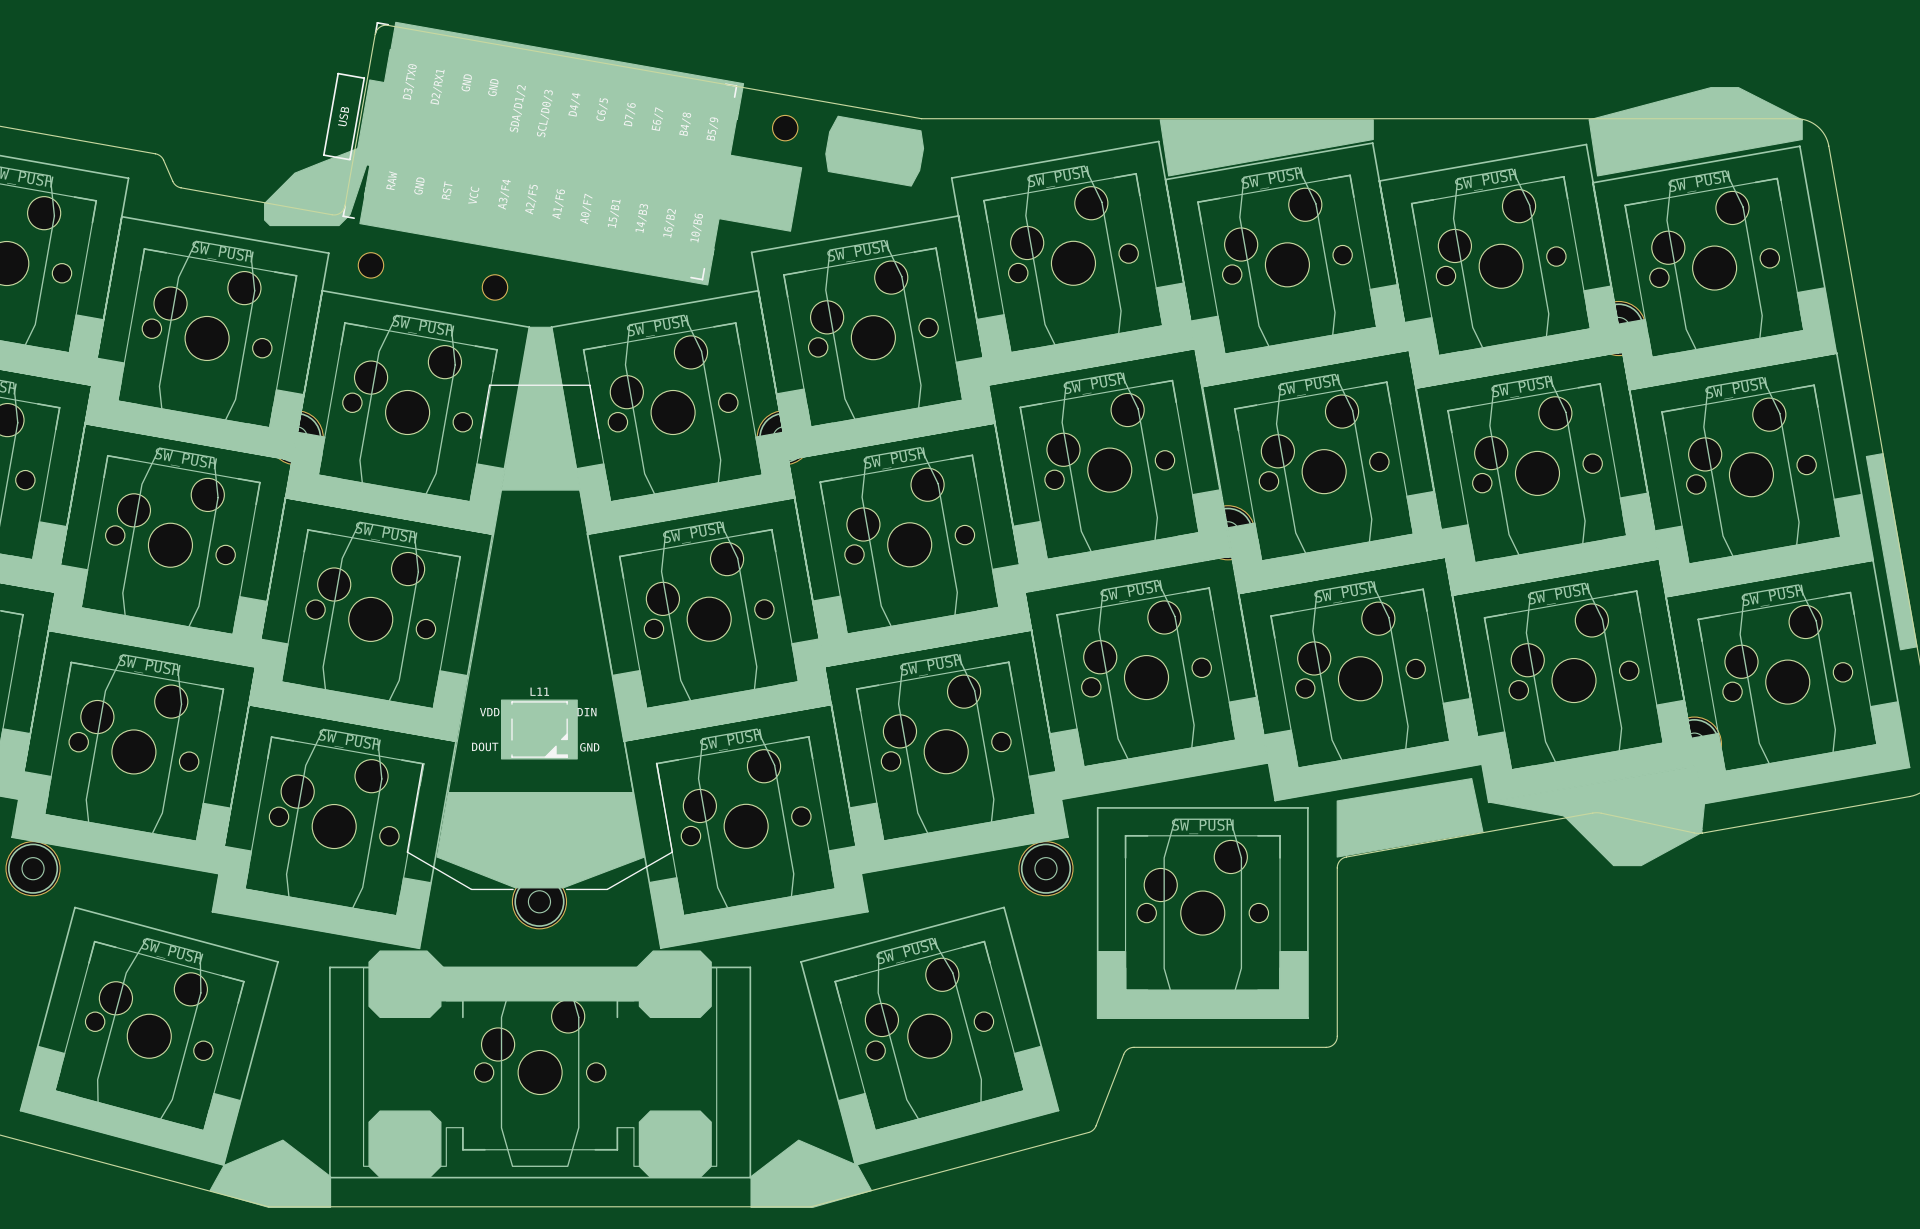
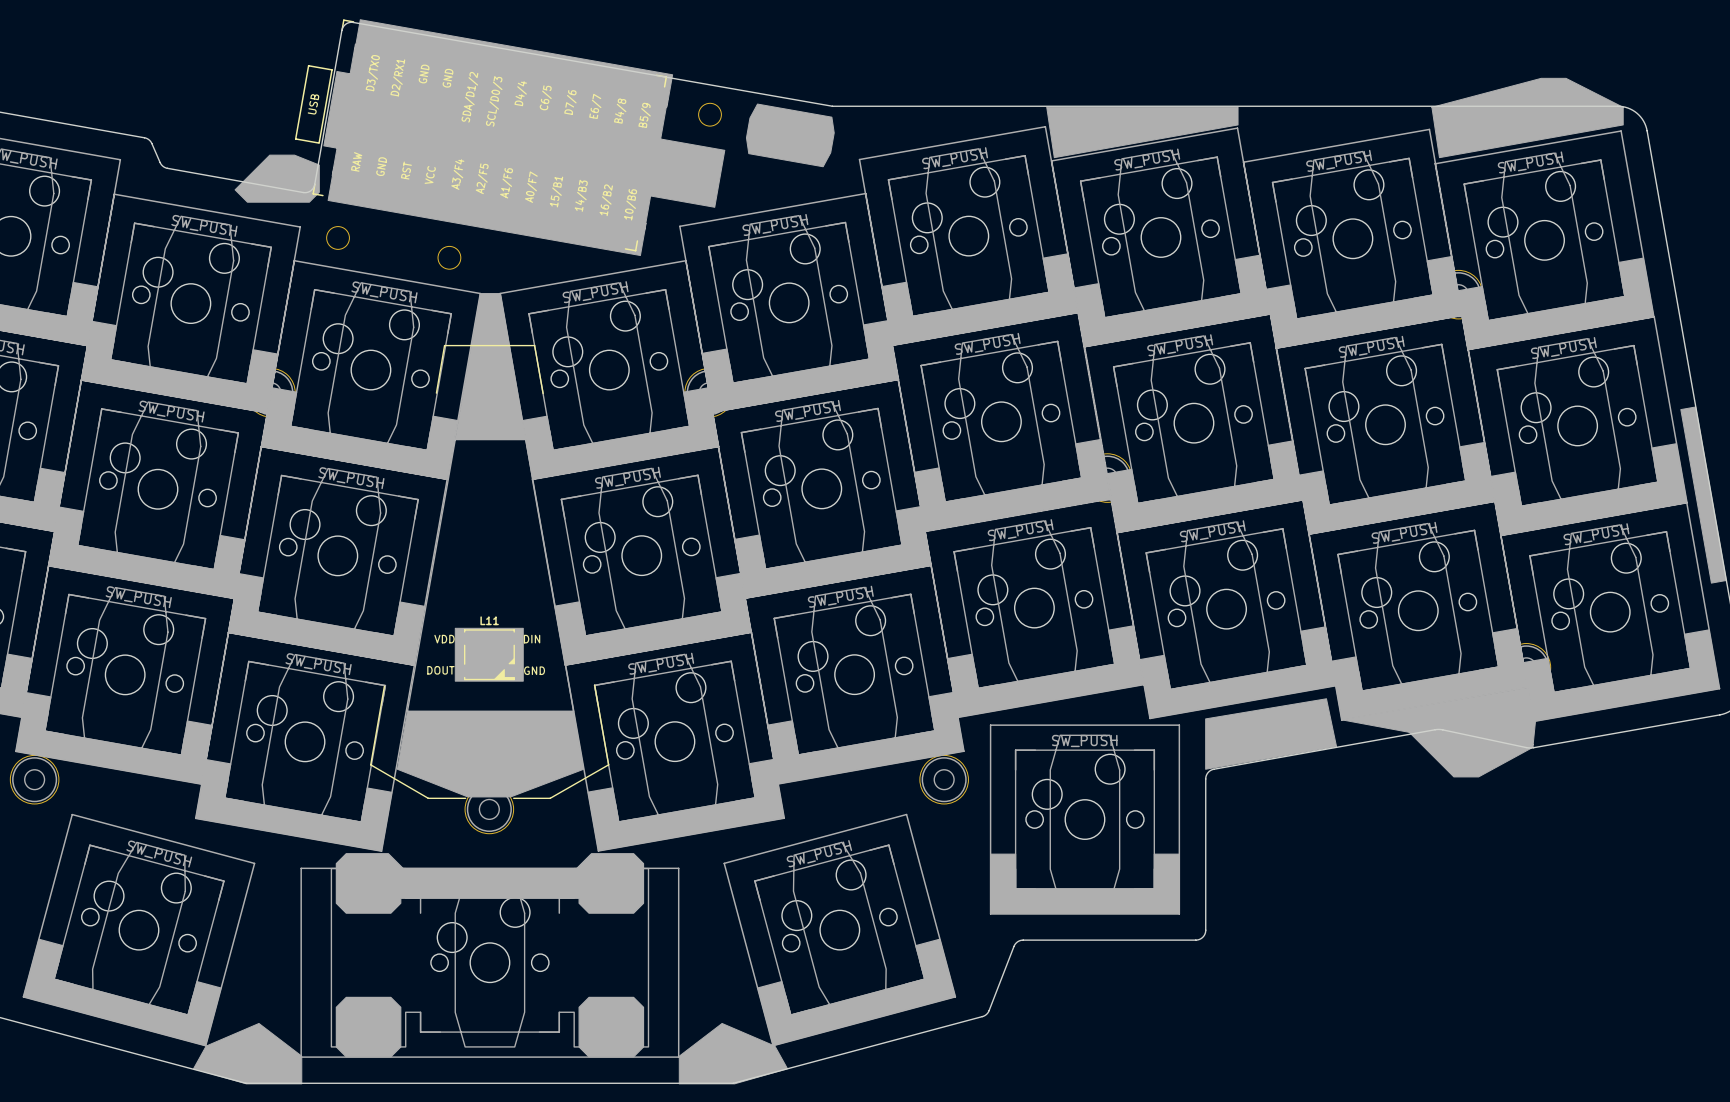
drawing: [264, 147, 368, 227] -> none
drawing: none -> [234, 154, 320, 203]

